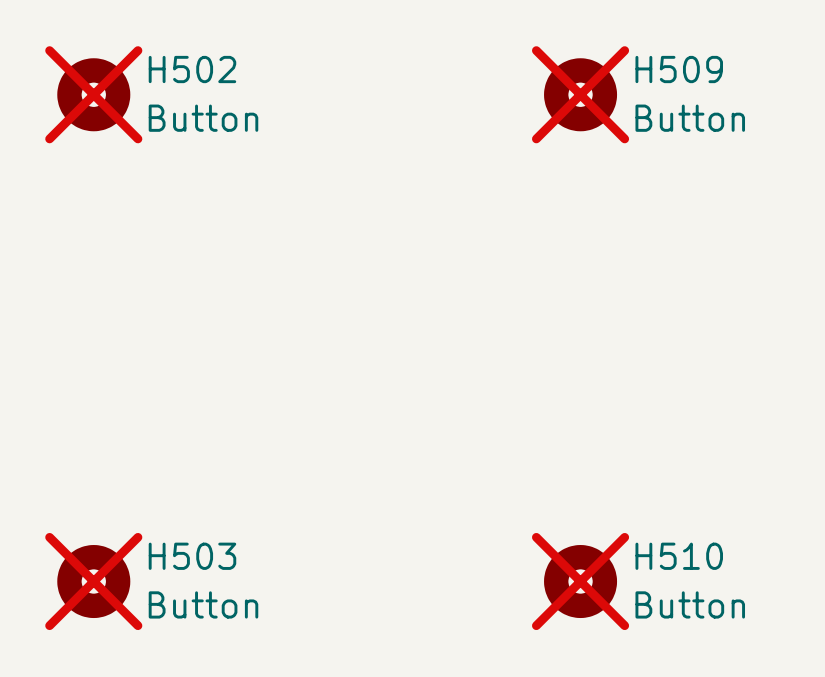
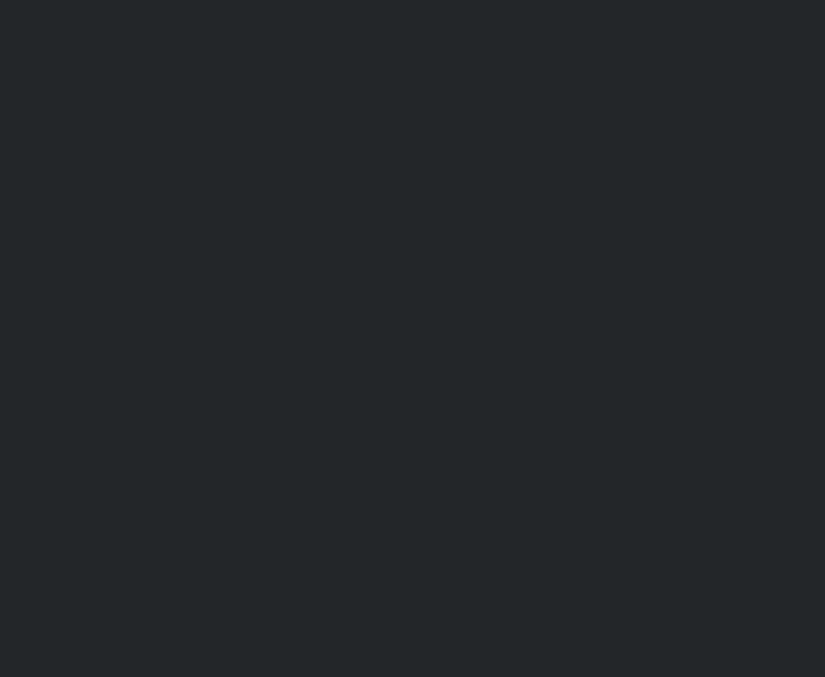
H502: Button (93, 94) -> none
H509: Button (580, 94) -> none
H503: Button (93, 581) -> none
H510: Button (580, 581) -> none

